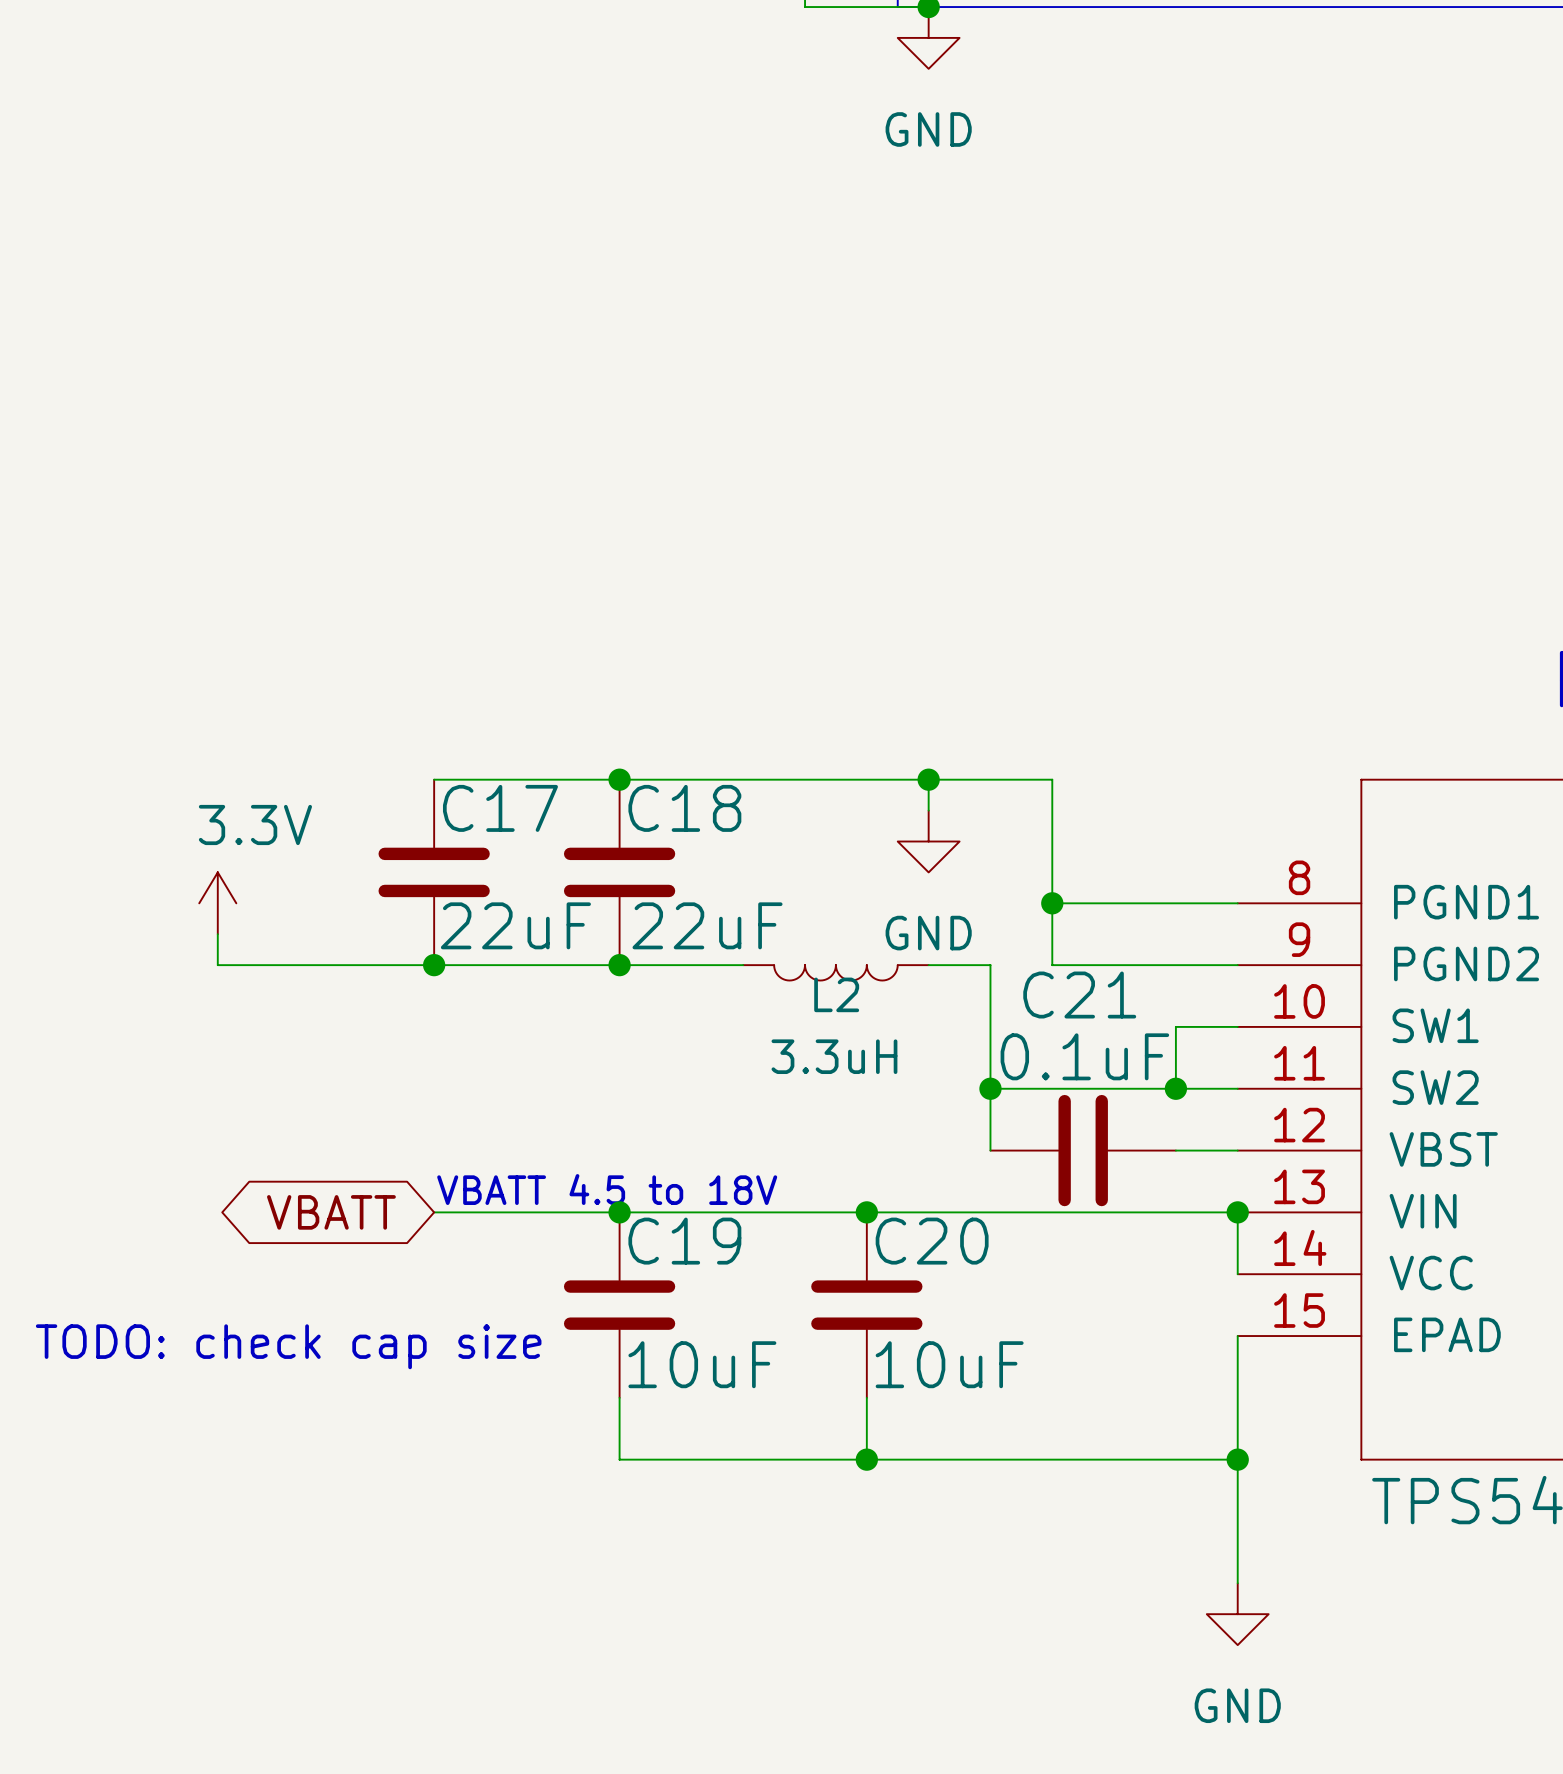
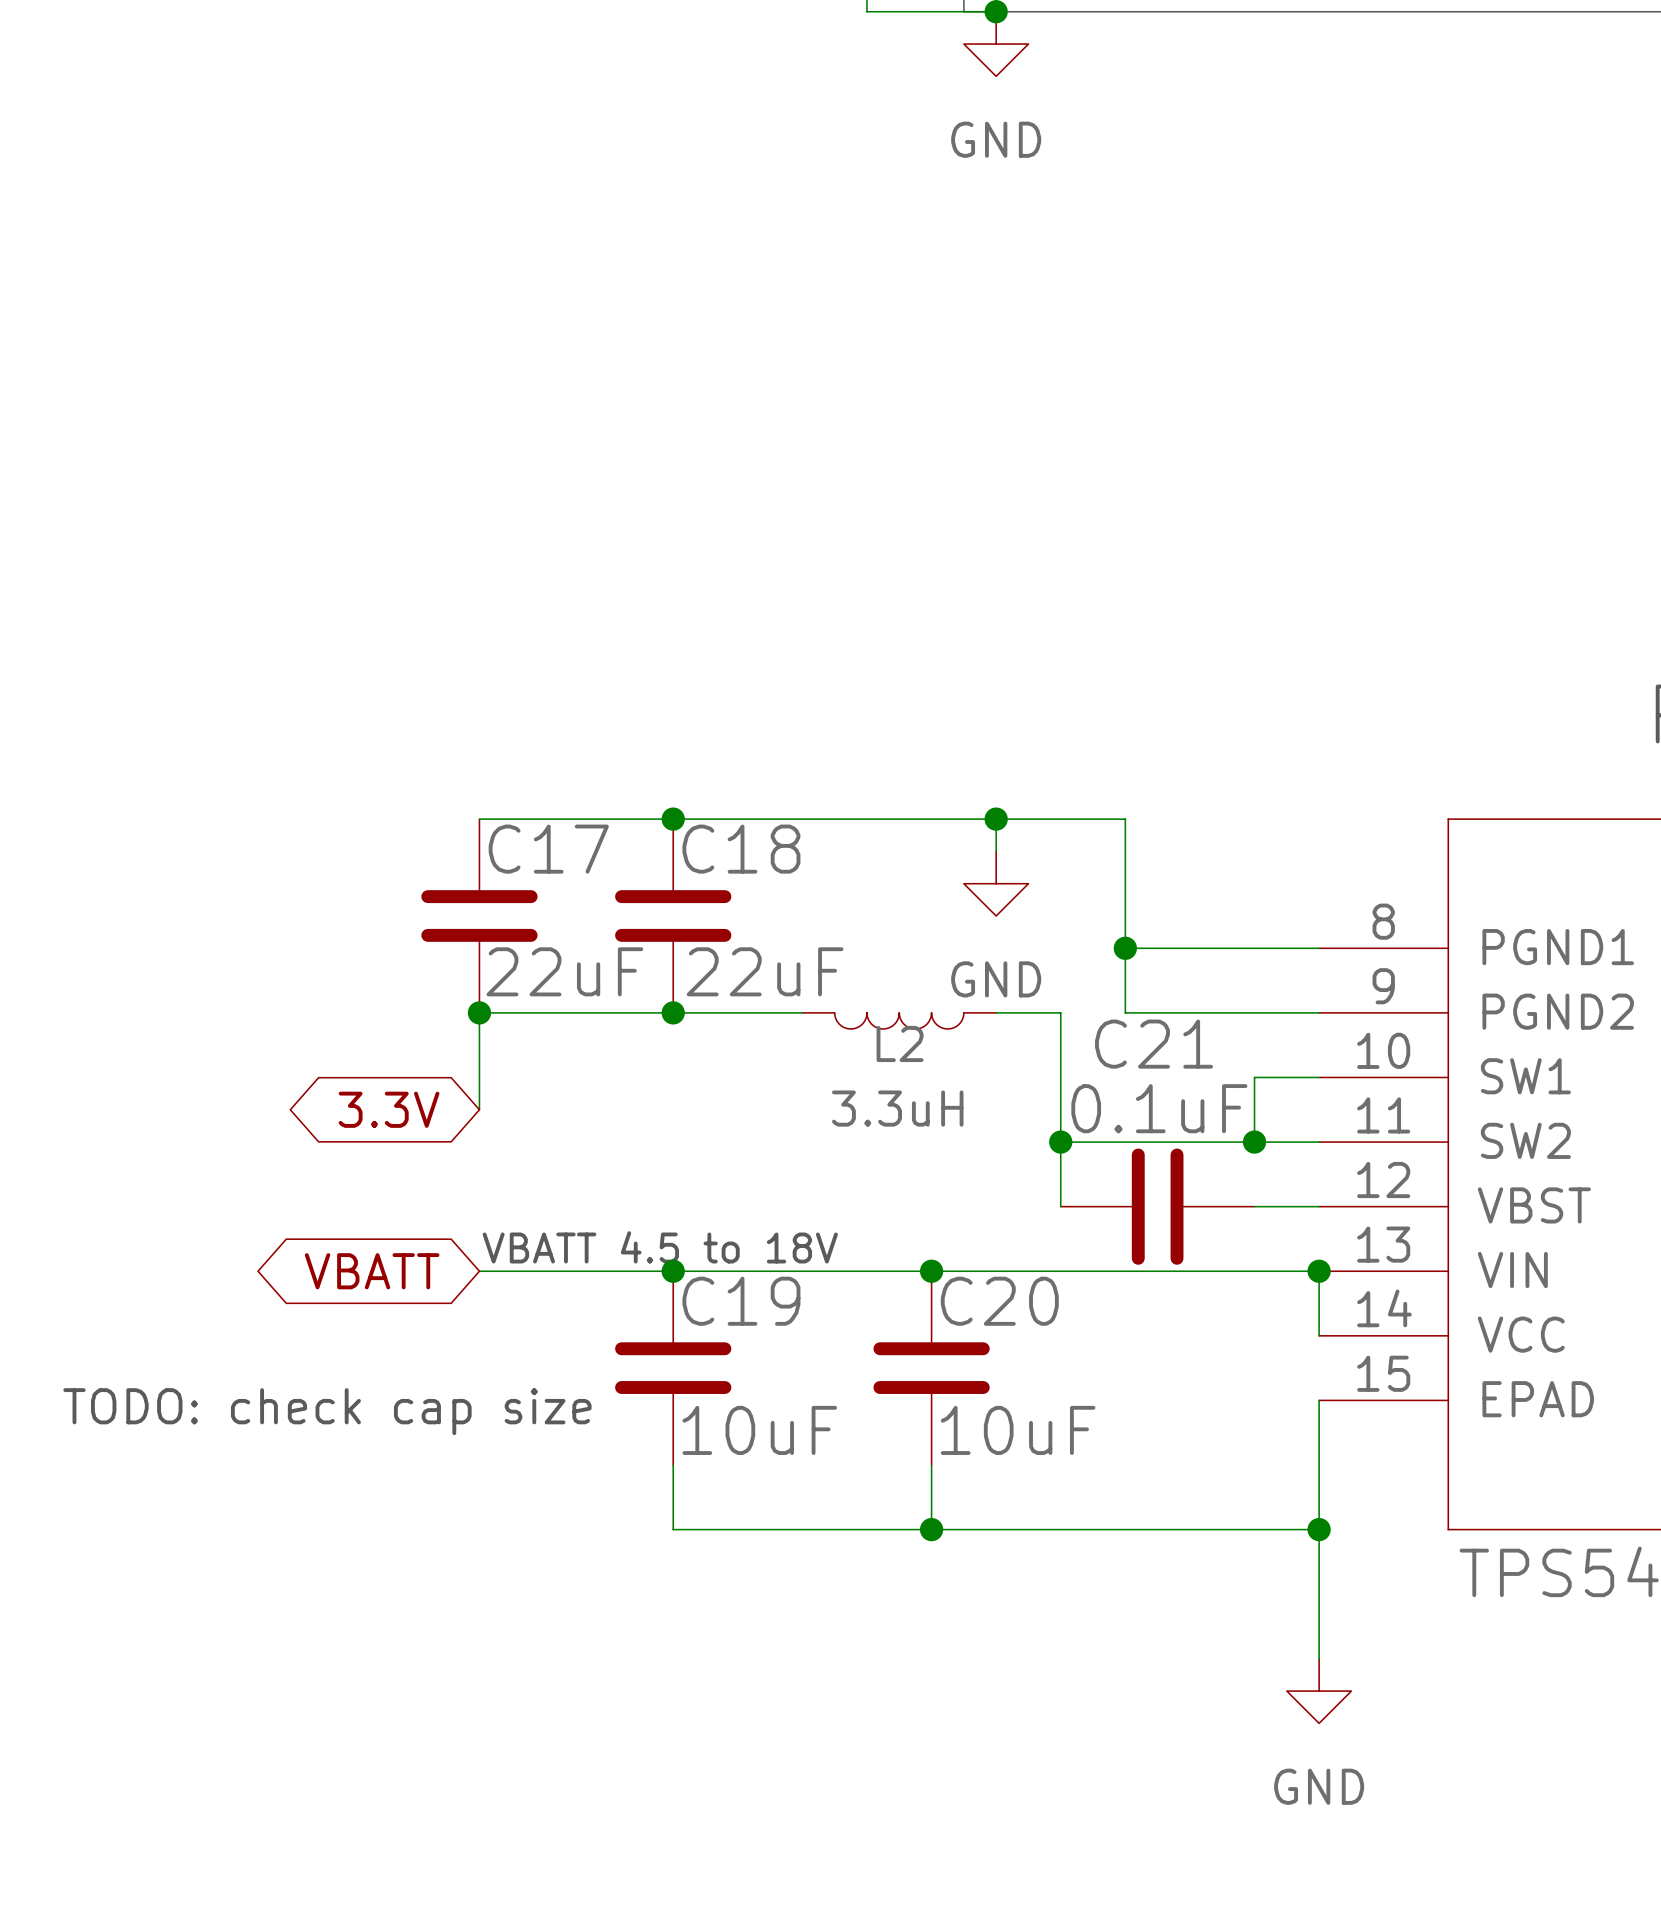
power symbol: 3.3V (217, 903) -> none
wire: (217, 934) (217, 965) (434, 965) -> (479, 1109) (479, 1012)
global label: none -> 3.3V (389, 1109)

